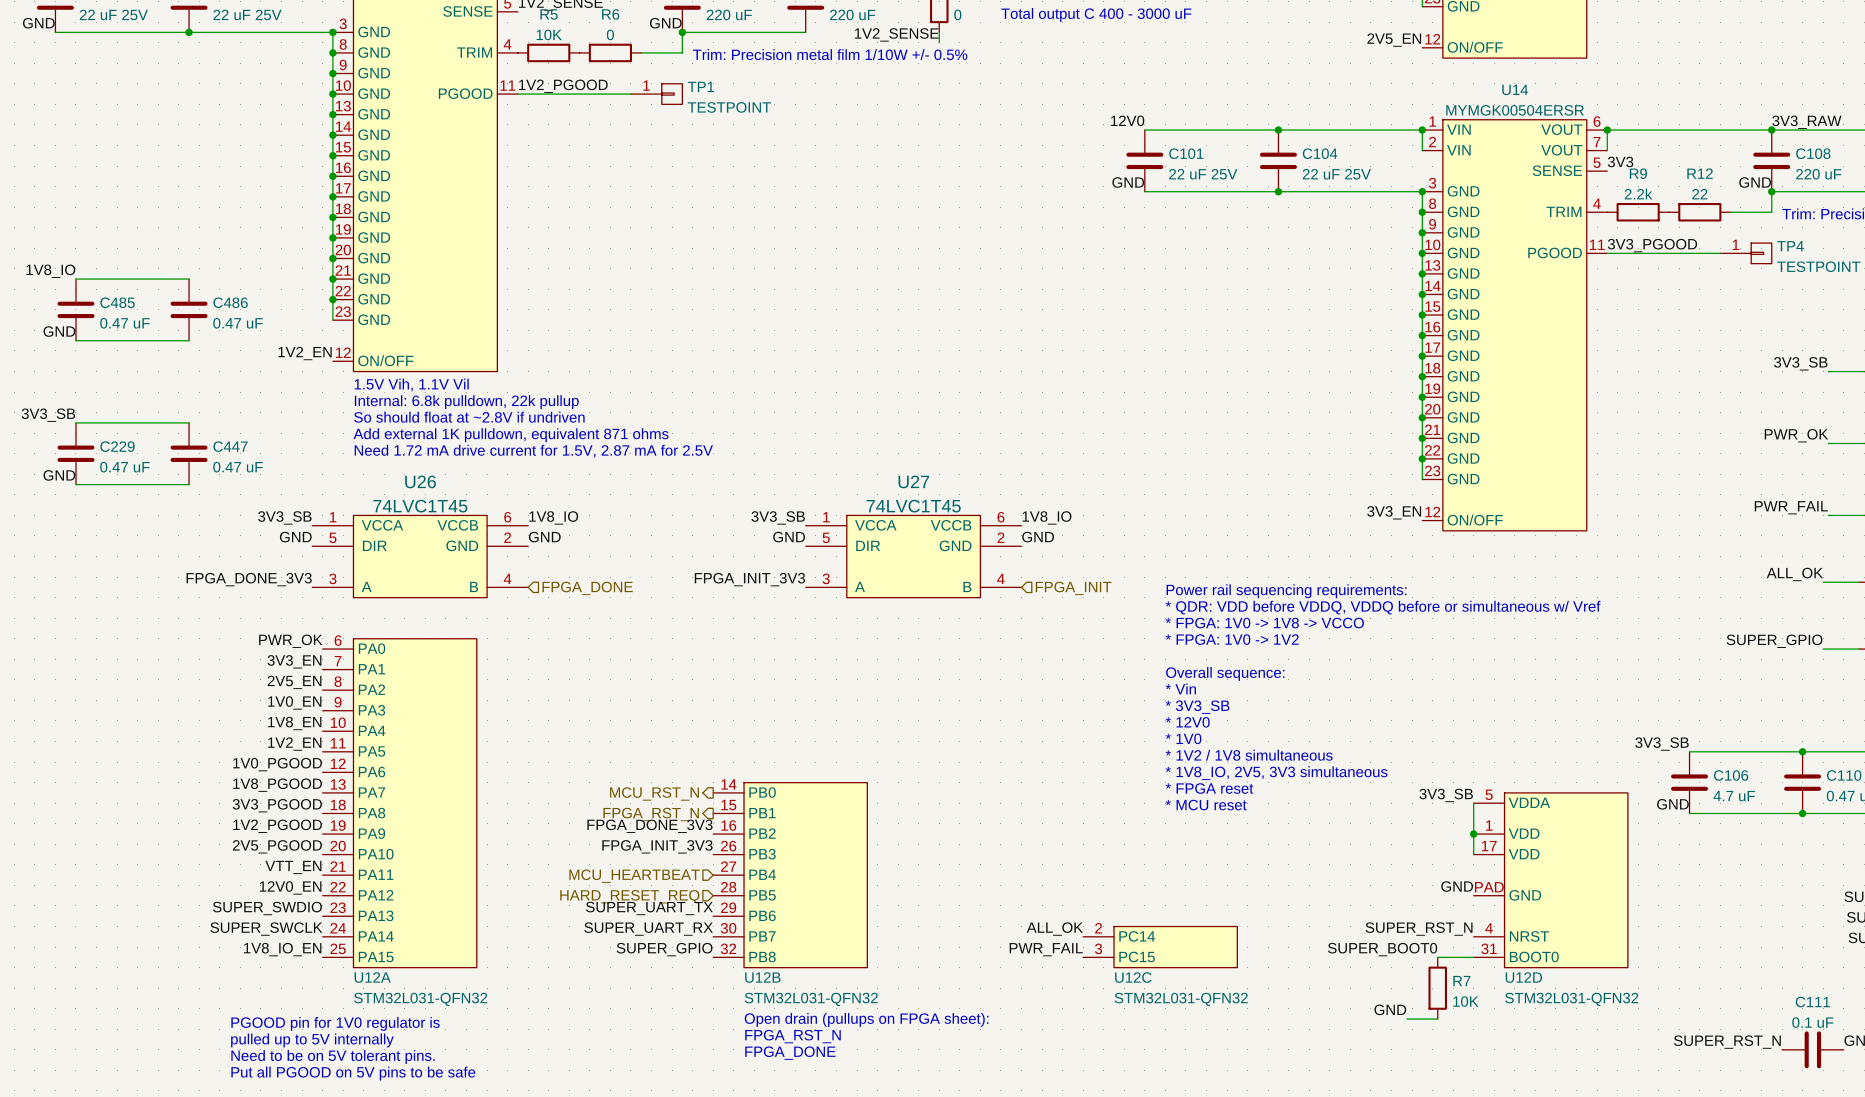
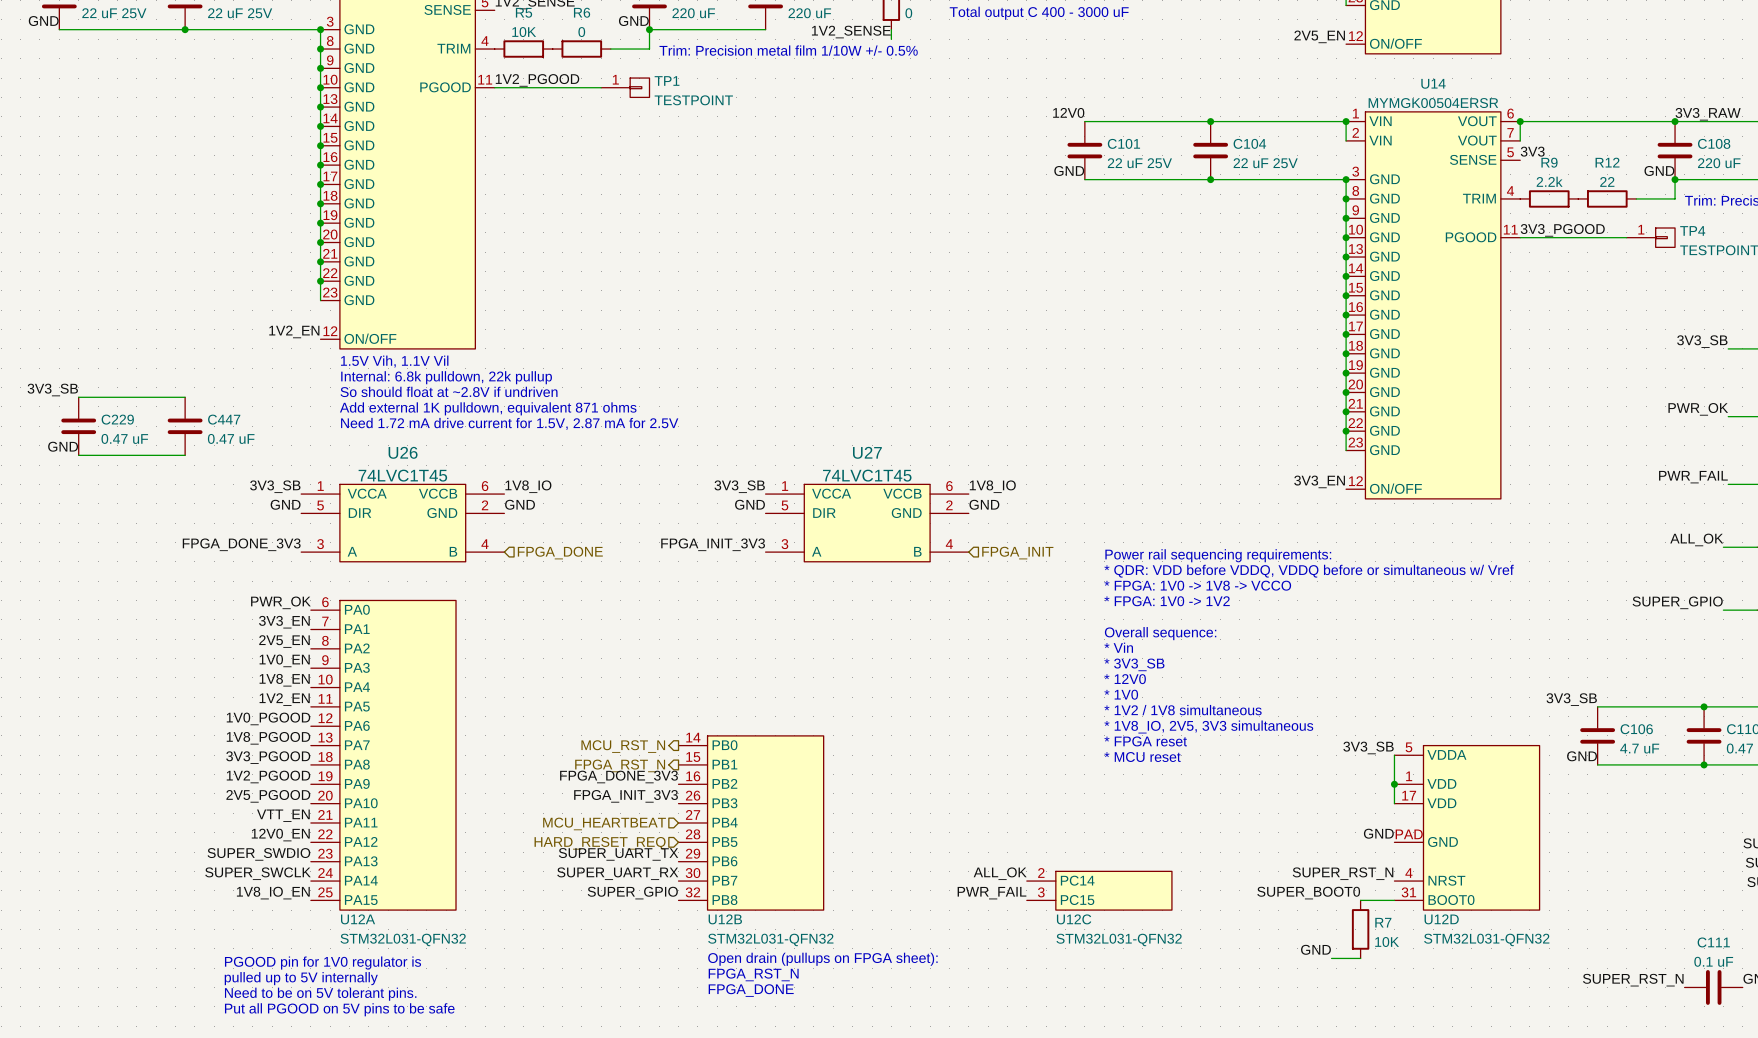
label: 1V8_IO (50, 271) -> none
wire: (75, 279) (189, 279) -> none
C485: 0.47 uF (75, 309) -> none
C486: 0.47 uF (189, 309) -> none
label: GND (59, 331) -> none
wire: (75, 340) (189, 340) -> none

